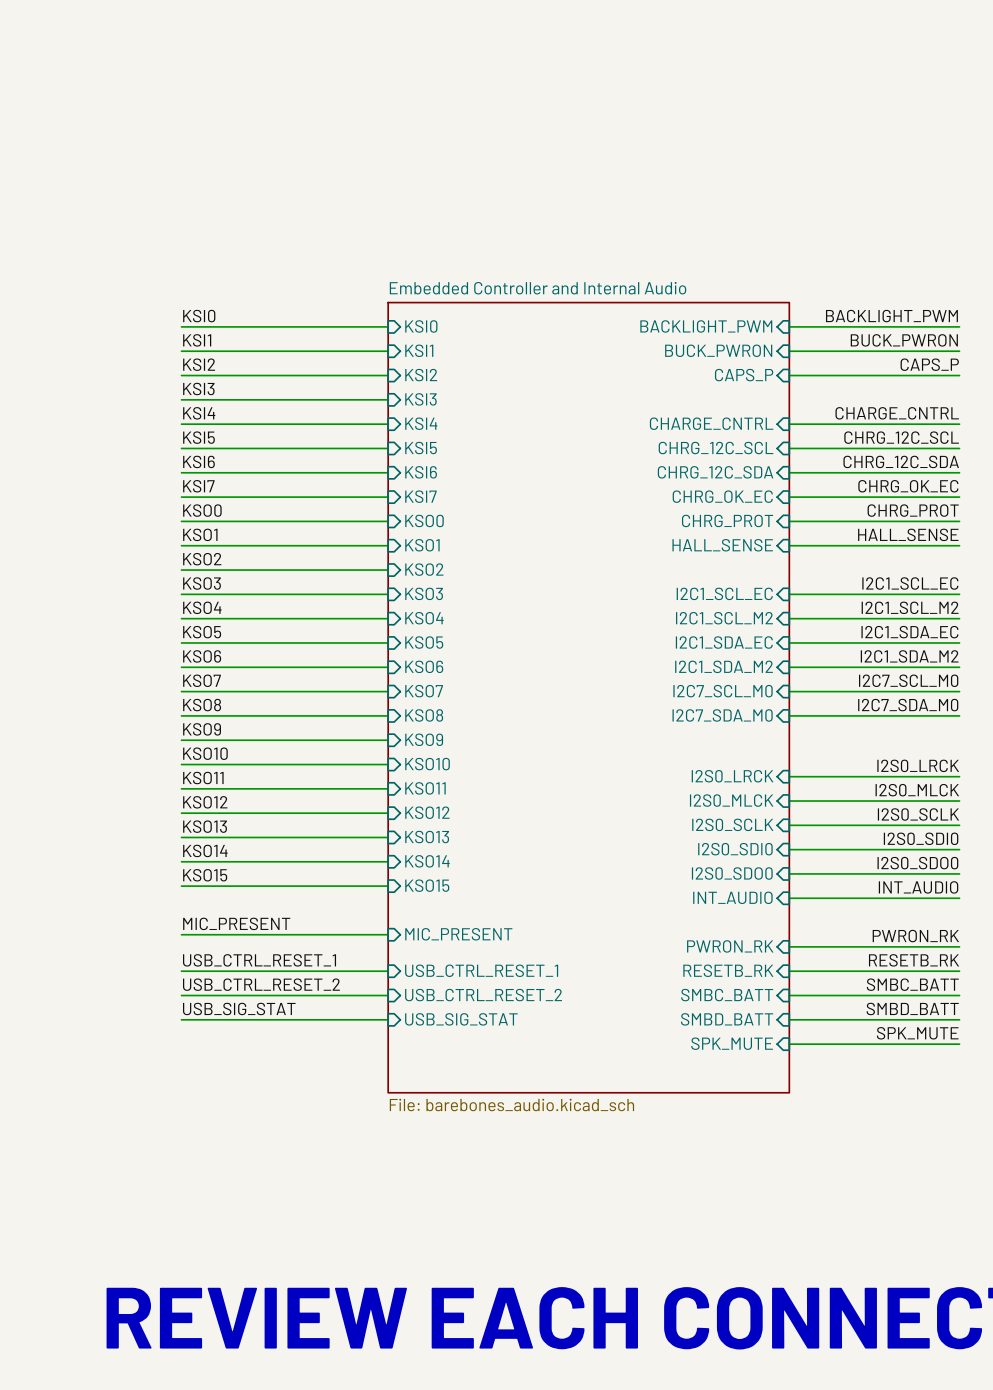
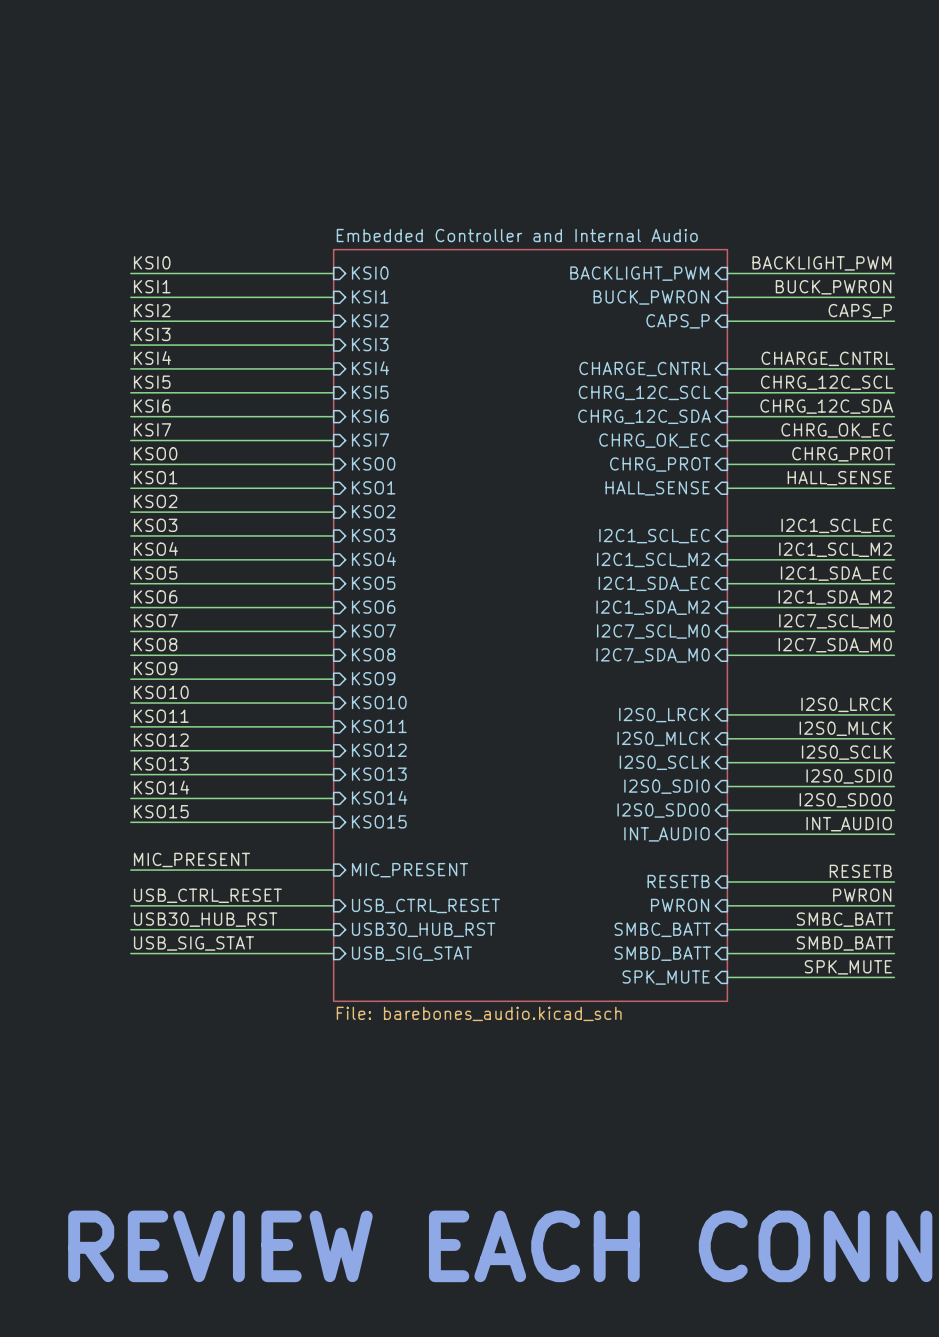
sheet Embedded Controller and Internal Audio: none -> File: barebones_audio.kicad_sch (530, 625)
sheet Embedded Controller and Internal Audio: File: barebones_audio.kicad_sch (588, 697) -> none
label: PWRON_RK (915, 936) -> RESETB (860, 871)
sheet pin: PWRON_RK (730, 946) -> RESETB (678, 881)
label: USB_CTRL_RESET_1 (259, 960) -> USB_CTRL_RESET (207, 895)
label: RESETB_RK (914, 960) -> PWRON (862, 895)
sheet pin: USB_CTRL_RESET_1 (481, 970) -> USB_CTRL_RESET (425, 905)
sheet pin: RESETB_RK (728, 970) -> PWRON (680, 905)
label: USB_CTRL_RESET_2 (261, 984) -> USB30_HUB_RST (205, 919)
sheet pin: USB_CTRL_RESET_2 (483, 995) -> USB30_HUB_RST (423, 929)

